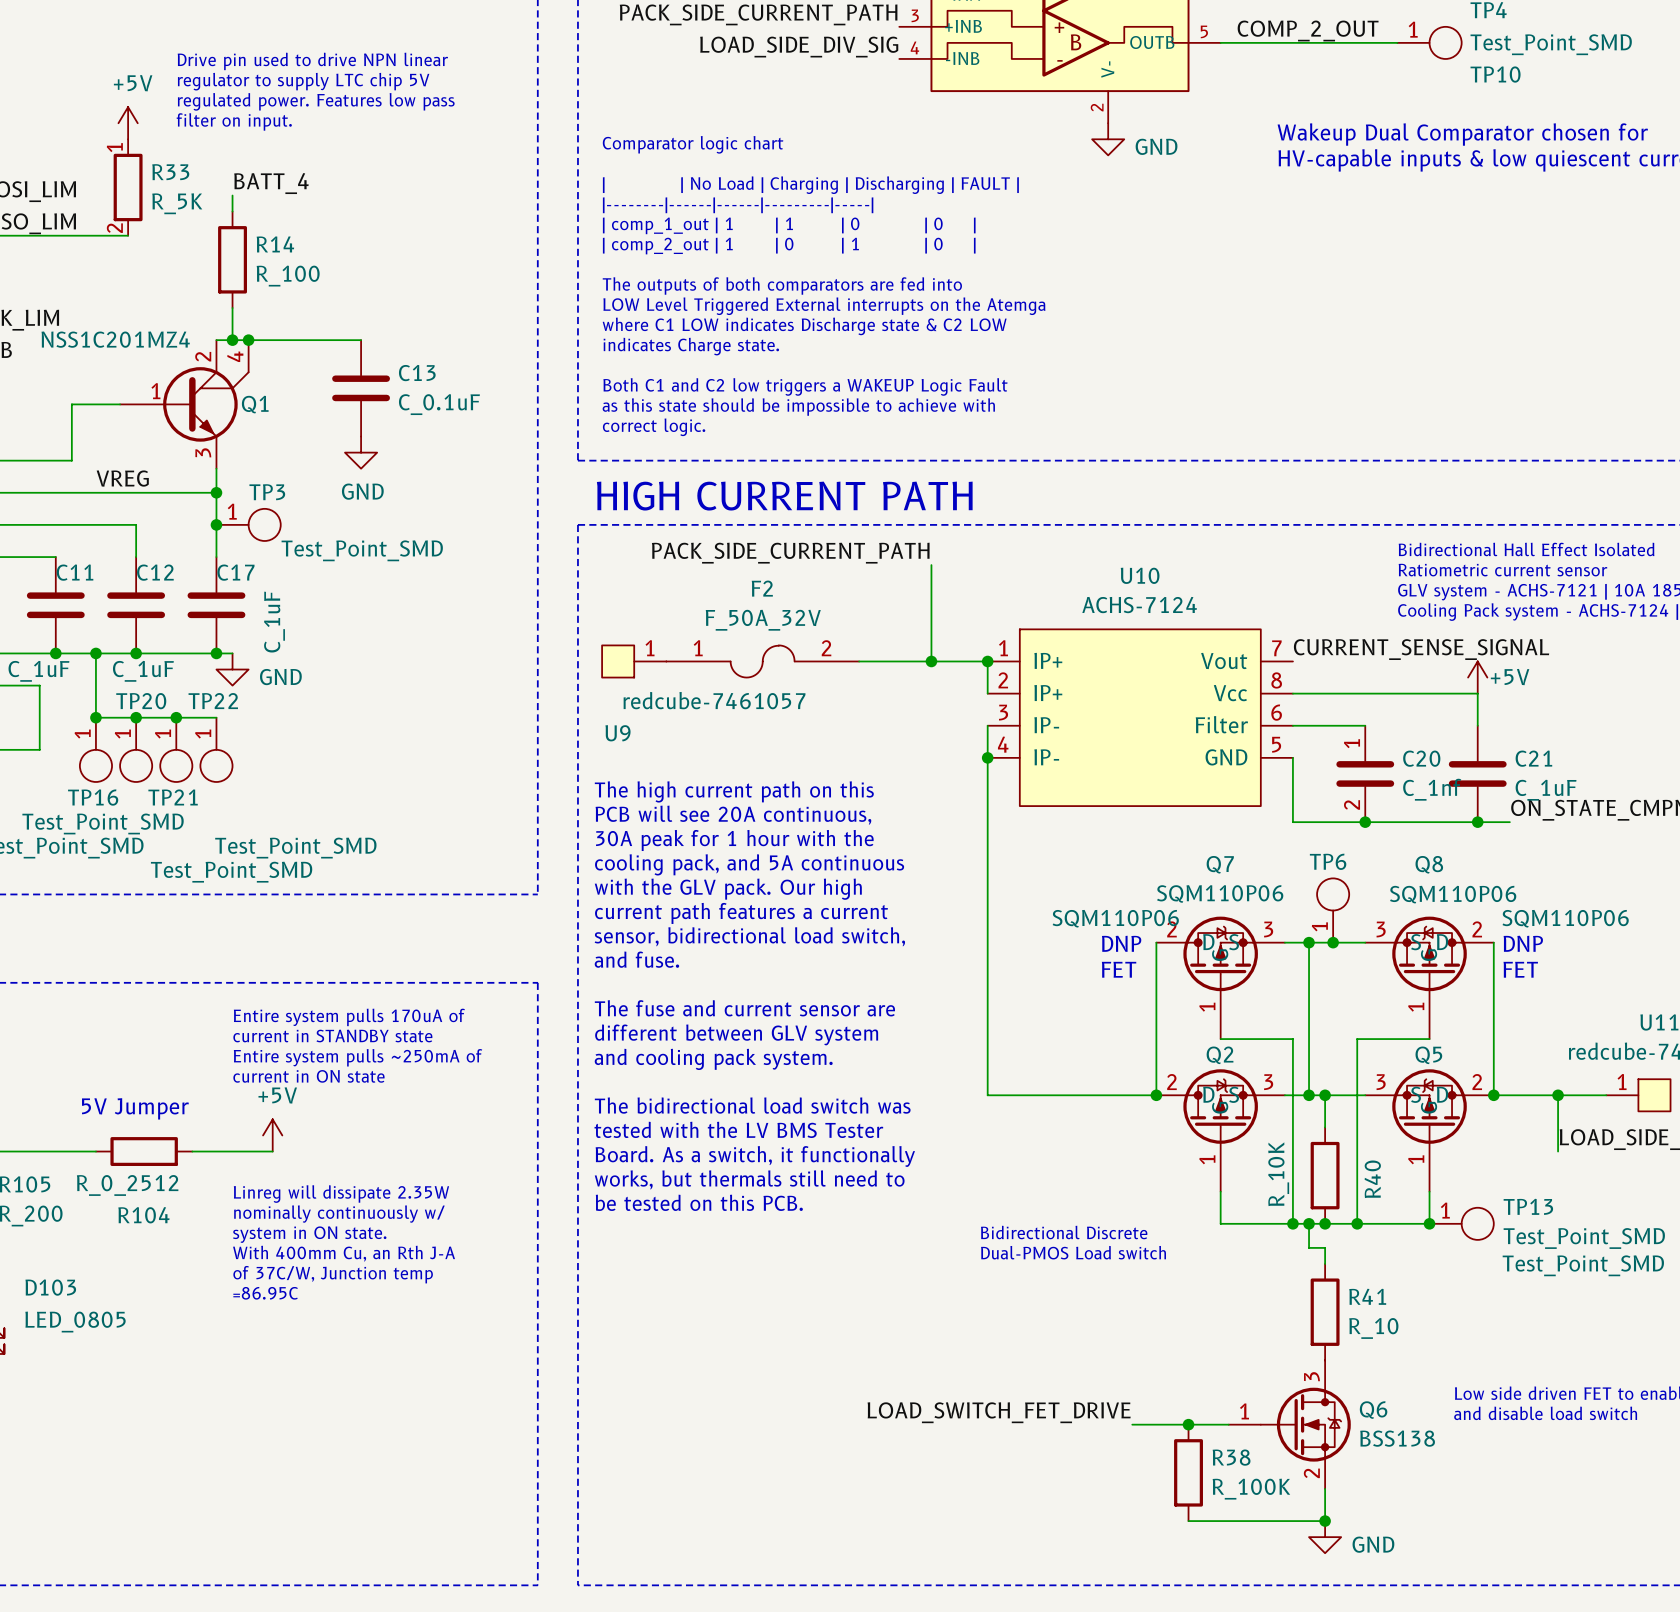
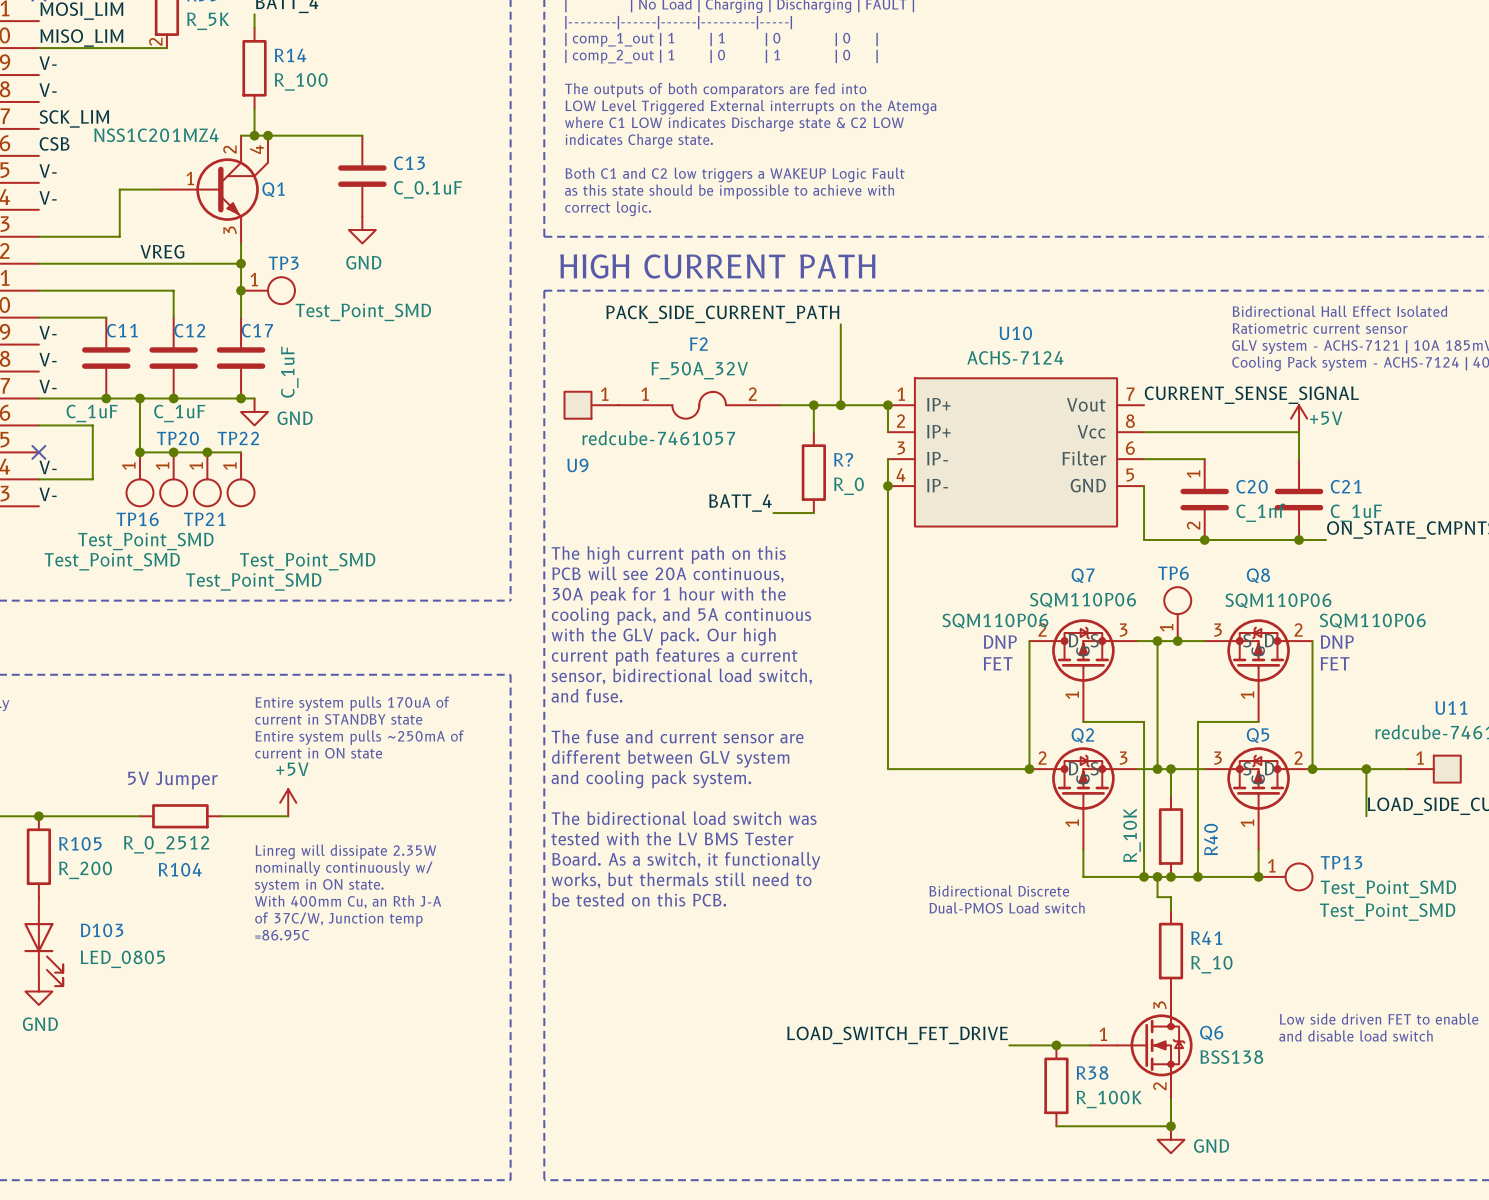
wire: none -> (813, 405) (813, 432)
junction: none -> (813, 405)
R?: none -> R_0 (813, 472)
label: none -> BATT_4 (740, 503)
wire: none -> (773, 513) (813, 513)
text position: The high current path on this (734, 791) -> The high current path on this (668, 555)
text position: PCB will see 20A continuous, (733, 815) -> PCB will see 20A continuous, (667, 574)
text position: 30A peak for 1 hour with the (734, 840) -> 30A peak for 1 hour with the (669, 595)
text position: cooling pack, and 5A continuous (749, 864) -> cooling pack, and 5A continuous (681, 616)
text position: with the GLV pack. Our high (728, 889) -> with the GLV pack. Our high (663, 636)
text position: current path features a current (741, 913) -> current path features a current (674, 657)
text position: sensor, bidirectional load switch, (749, 936) -> sensor, bidirectional load switch, (681, 676)
text position: and fuse. (636, 959) -> and fuse. (587, 695)
text position: The fuse and current sensor are (744, 1008) -> The fuse and current sensor are (677, 736)
text position: different between GLV system (736, 1034) -> different between GLV system (670, 758)
text position: and cooling pack system. (713, 1059) -> and cooling pack system. (651, 779)
text position: The bidirectional load switch was (752, 1105) -> The bidirectional load switch was (684, 818)
text position: tested with the LV BMS Tester (738, 1129) -> tested with the LV BMS Tester (672, 838)
text position: Board. As a switch, it functionally (755, 1156) -> Board. As a switch, it functionally (686, 860)
text position: works, but thermals still need to (749, 1179) -> works, but thermals still need to (681, 880)
text position: be tested on this PCB. (699, 1202) -> be tested on this PCB. (639, 899)
text position: Bidirectional Discrete (1064, 1232) -> Bidirectional Discrete (999, 890)
text position: Dual-PMOS Load switch (1073, 1252) -> Dual-PMOS Load switch (1007, 907)

